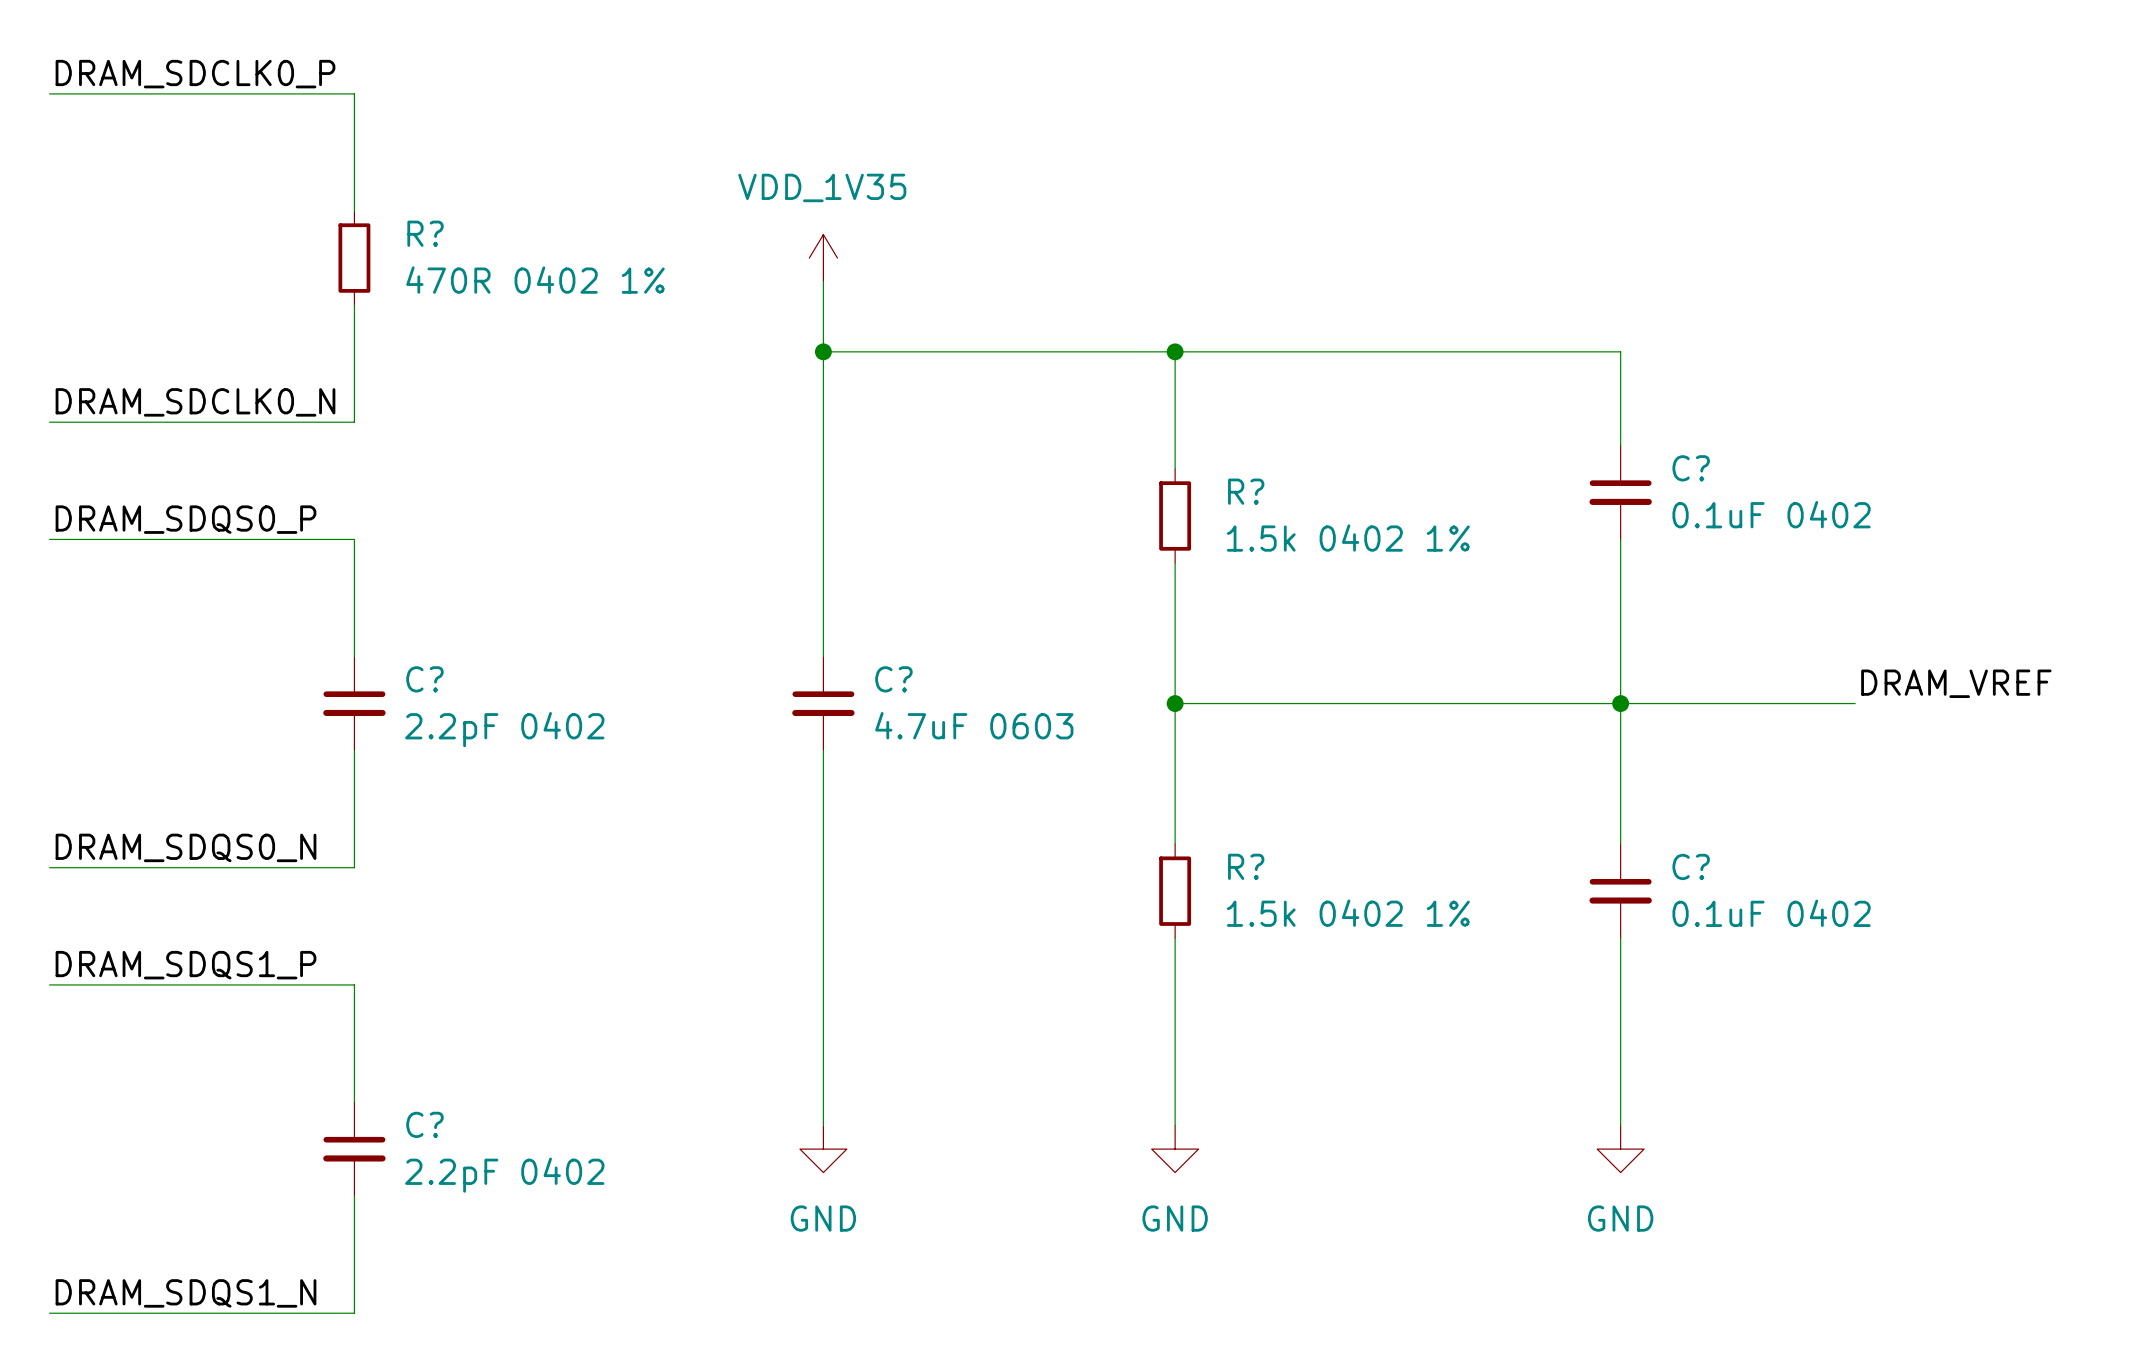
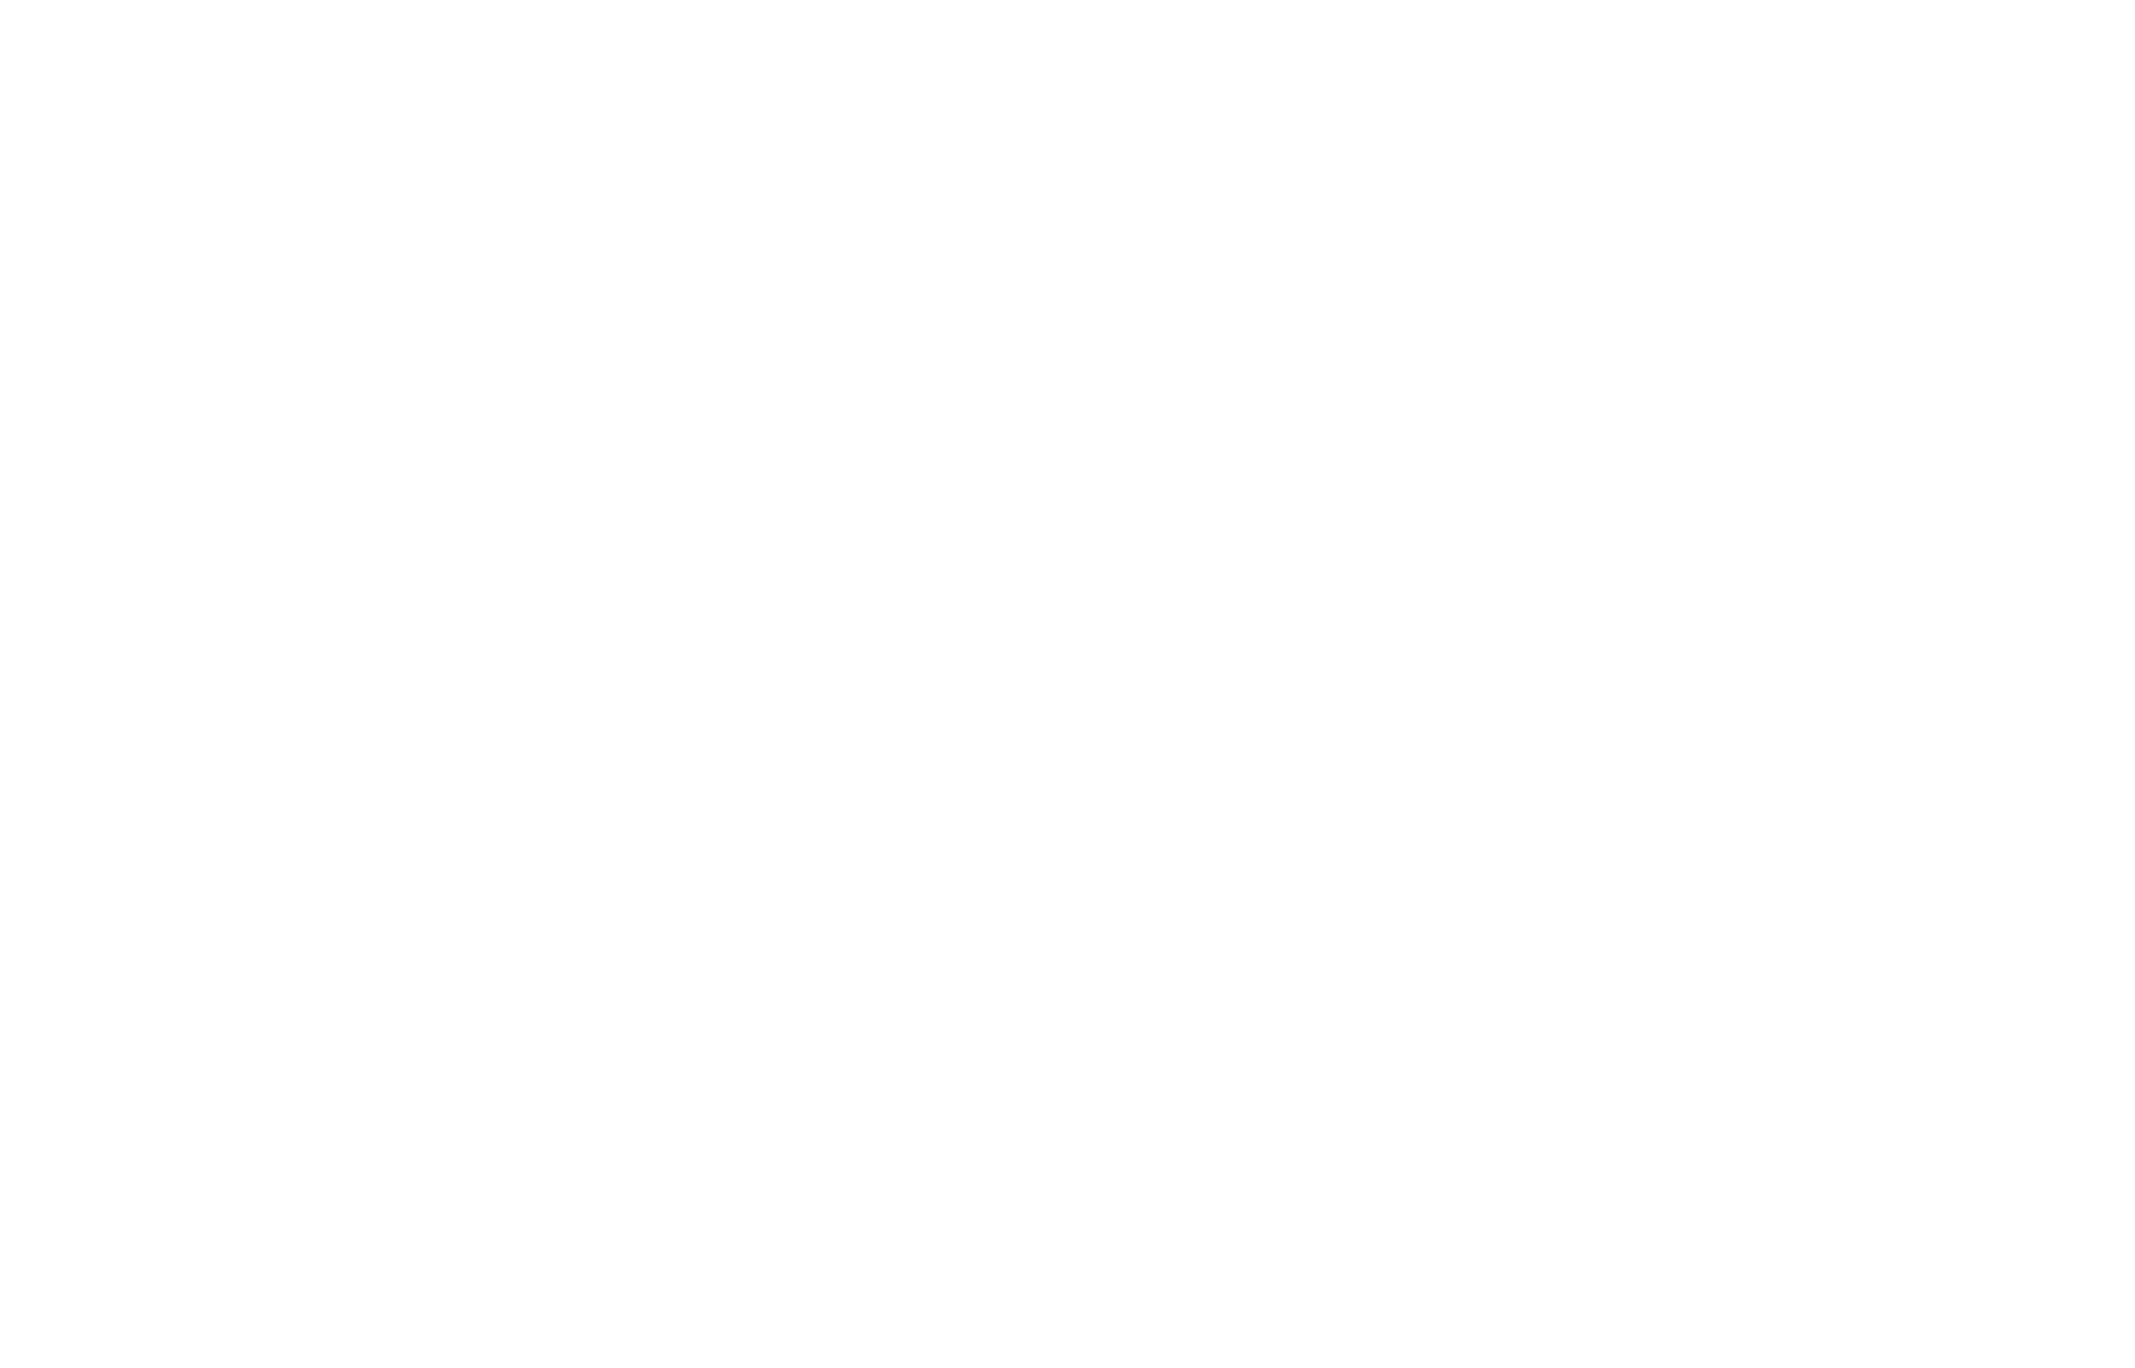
label: DRAM_SDCLK0_P (195, 74) -> none
wire: (49, 93) (354, 93) (354, 211) -> none
R?: 470R 0402 1% (354, 258) -> none
power symbol: VDD_1V35 (823, 258) -> none
wire: (823, 281) (823, 656) -> none
wire: (354, 304) (354, 422) (49, 422) -> none
wire: (823, 351) (1620, 351) (1620, 445) -> none
junction: (823, 351) -> none
wire: (1175, 351) (1175, 469) -> none
junction: (1175, 351) -> none
label: DRAM_SDCLK0_N (195, 402) -> none
C?: 0.1uF 0402 (1620, 492) -> none
R?: 1.5k 0402 1% (1175, 515) -> none
label: DRAM_SDQS0_P (186, 519) -> none
wire: (49, 539) (354, 539) (354, 656) -> none
wire: (1620, 539) (1620, 844) -> none
wire: (1175, 562) (1175, 844) -> none
label: DRAM_VREF (1956, 683) -> none
C?: 2.2pF 0402 (354, 703) -> none
C?: 4.7uF 0603 (823, 703) -> none
wire: (1175, 703) (1855, 703) -> none
junction: (1175, 703) -> none
junction: (1620, 703) -> none
wire: (354, 750) (354, 867) (49, 867) -> none
wire: (823, 750) (823, 1125) -> none
label: DRAM_SDQS0_N (186, 847) -> none
R?: 1.5k 0402 1% (1175, 891) -> none
C?: 0.1uF 0402 (1620, 891) -> none
wire: (1175, 938) (1175, 1125) -> none
wire: (1620, 938) (1620, 1125) -> none
label: DRAM_SDQS1_P (186, 965) -> none
wire: (49, 984) (354, 984) (354, 1102) -> none
C?: 2.2pF 0402 (354, 1149) -> none
power symbol: GND (823, 1149) -> none
power symbol: GND (1175, 1149) -> none
power symbol: GND (1620, 1149) -> none
wire: (354, 1195) (354, 1313) (49, 1313) -> none
label: DRAM_SDQS1_N (186, 1293) -> none

